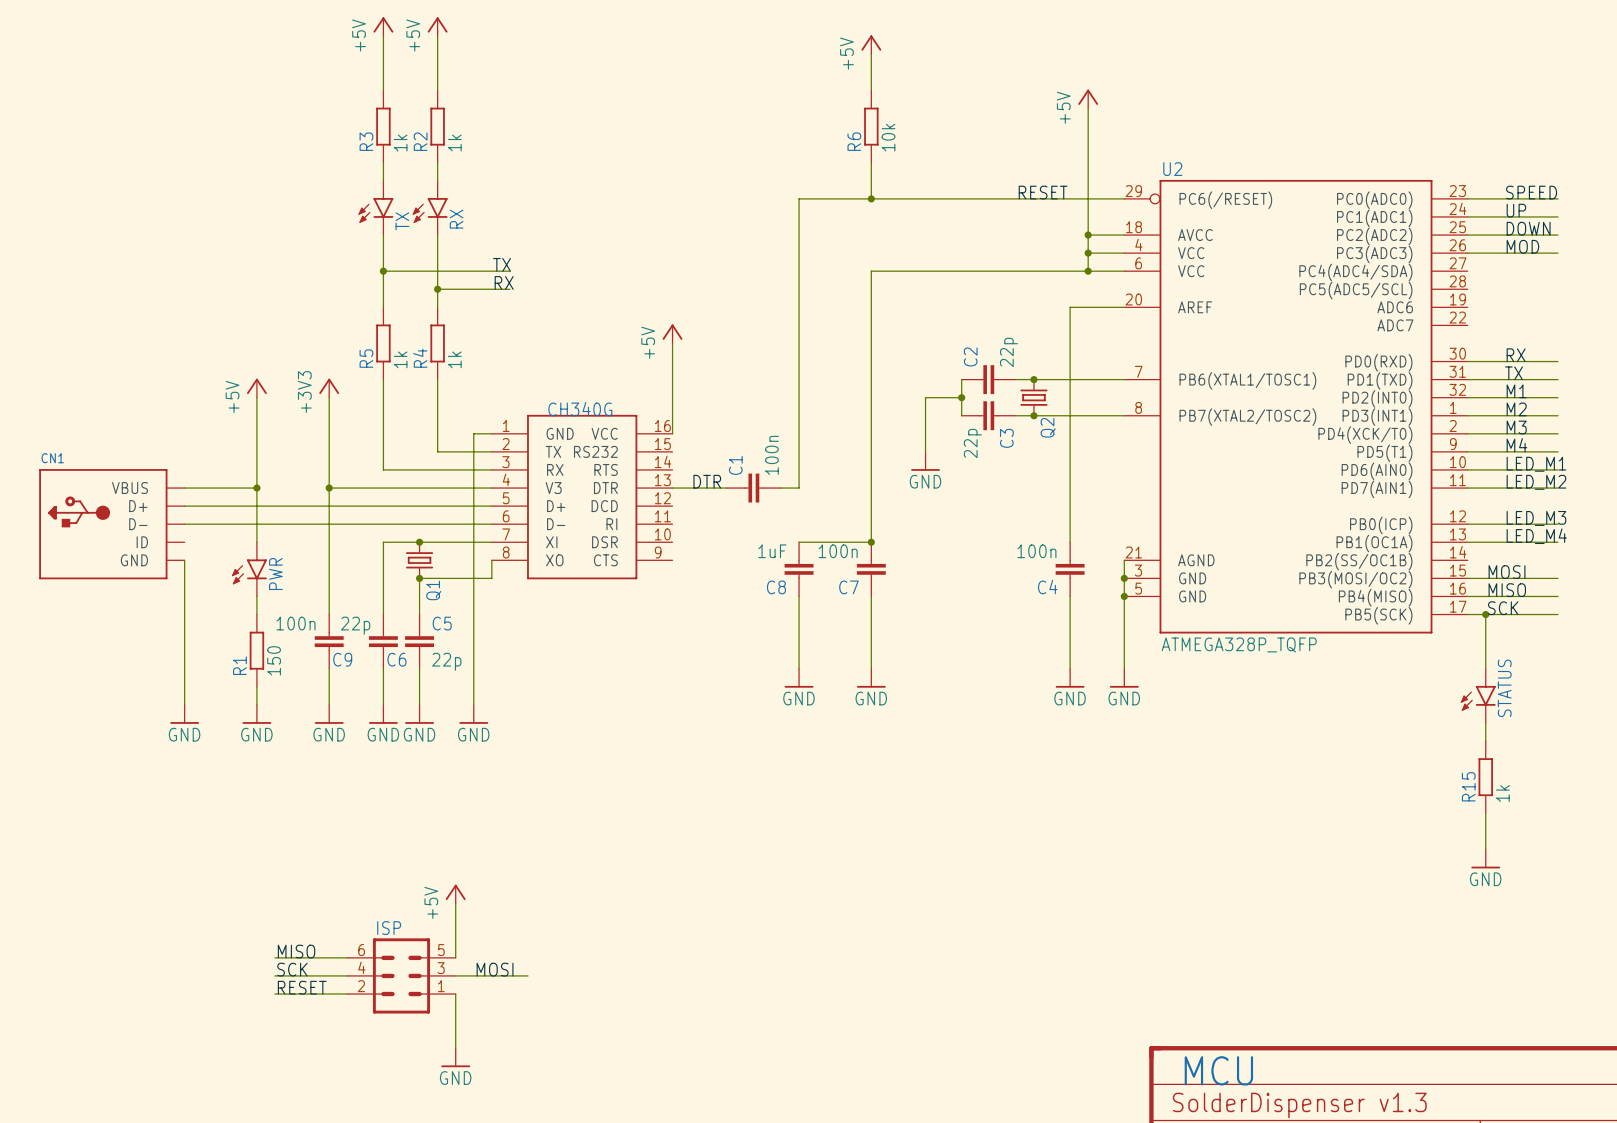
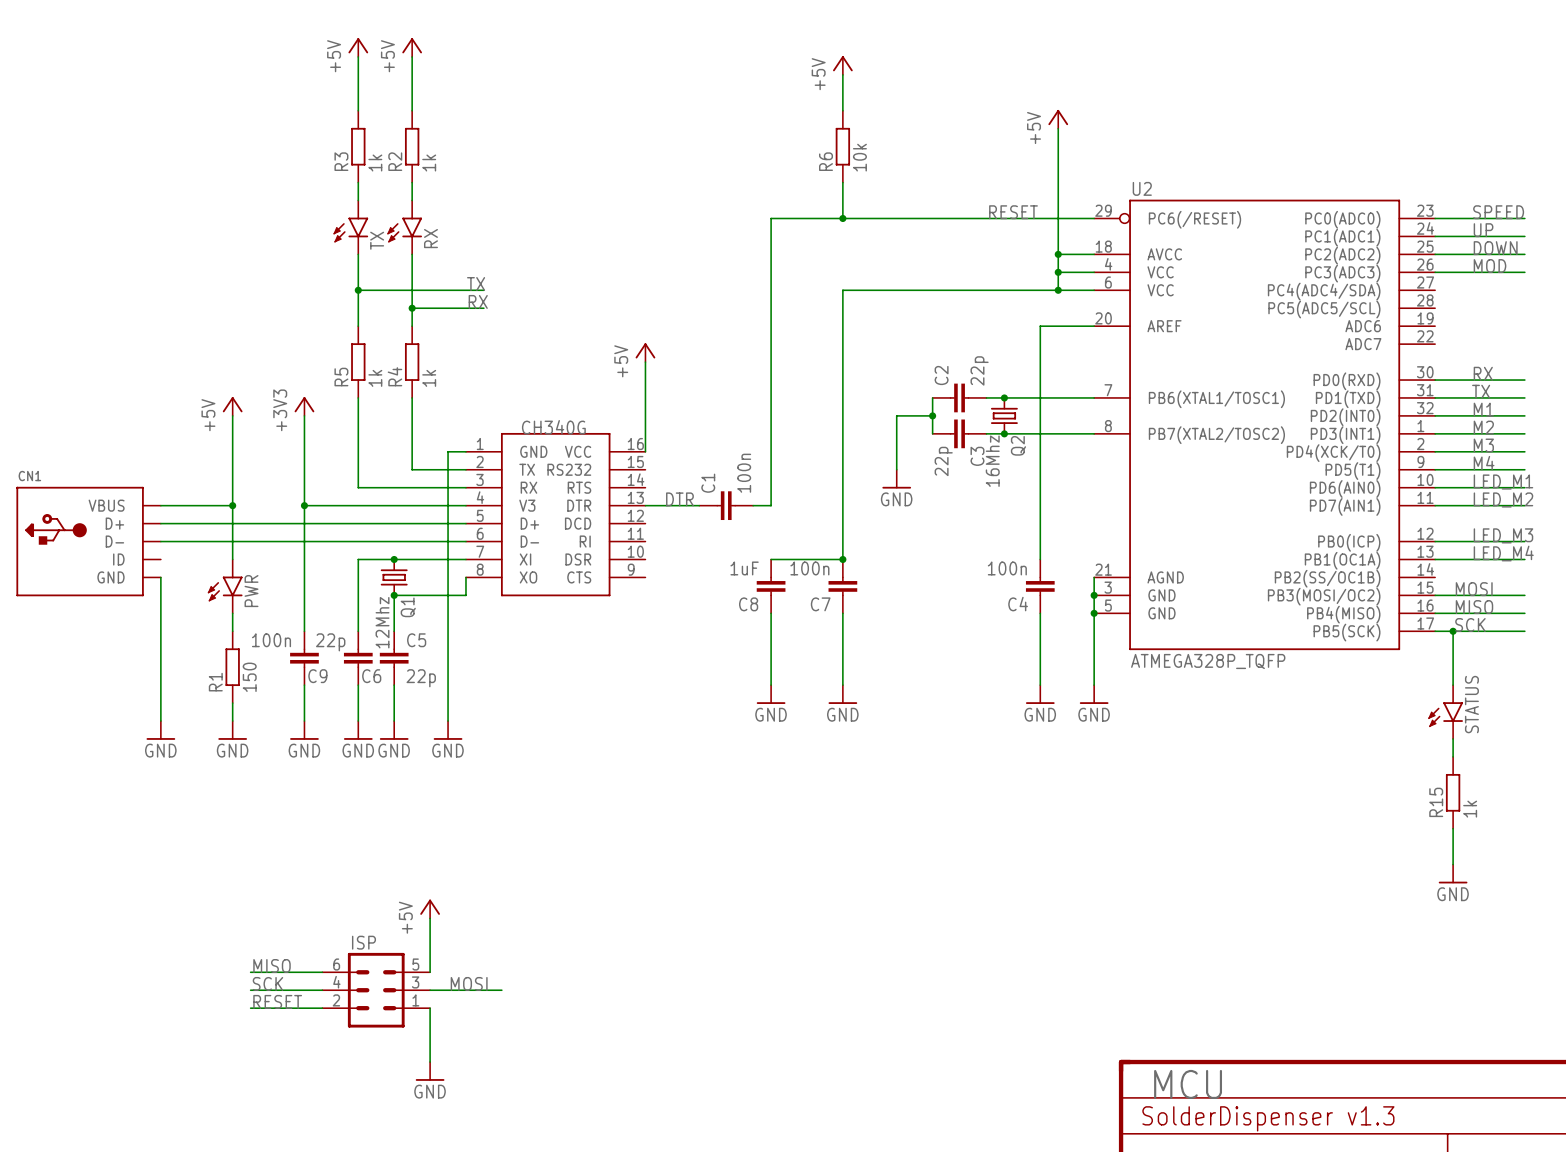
Q2 value: none -> 16Mhz (992, 461)
Q1 value: none -> 12Mhz (382, 622)

